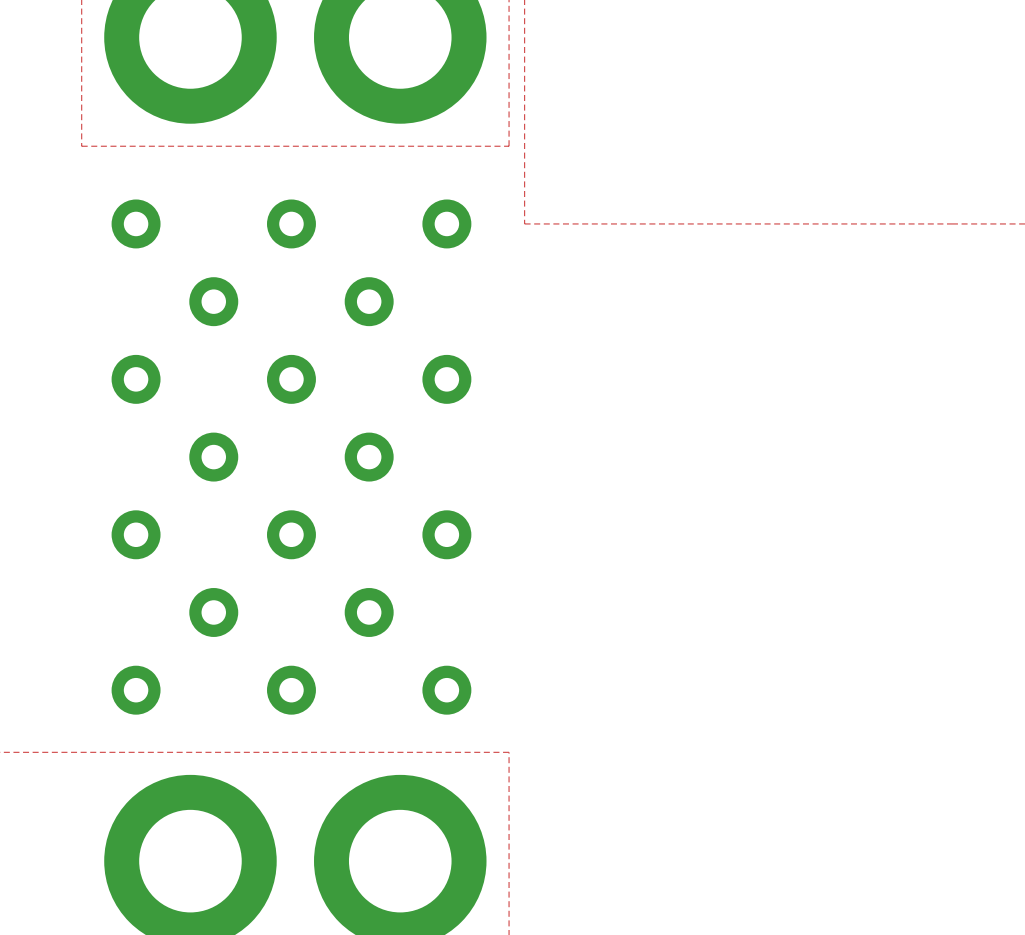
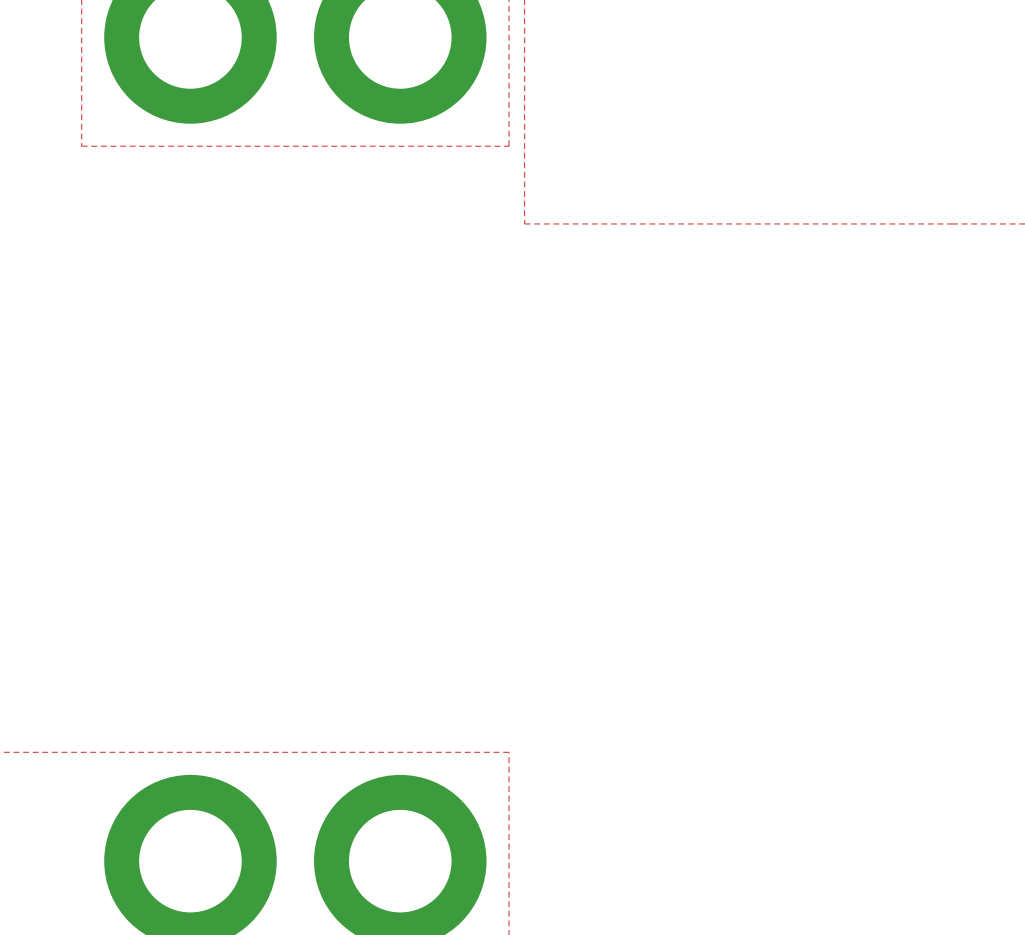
via: (136, 223) -> none
via: (291, 223) -> none
via: (446, 223) -> none
via: (213, 301) -> none
via: (369, 301) -> none
via: (136, 379) -> none
via: (291, 379) -> none
via: (446, 379) -> none
via: (213, 457) -> none
via: (369, 457) -> none
via: (136, 534) -> none
via: (291, 534) -> none
via: (446, 534) -> none
via: (213, 612) -> none
via: (369, 612) -> none
via: (136, 690) -> none
via: (291, 690) -> none
via: (446, 690) -> none

